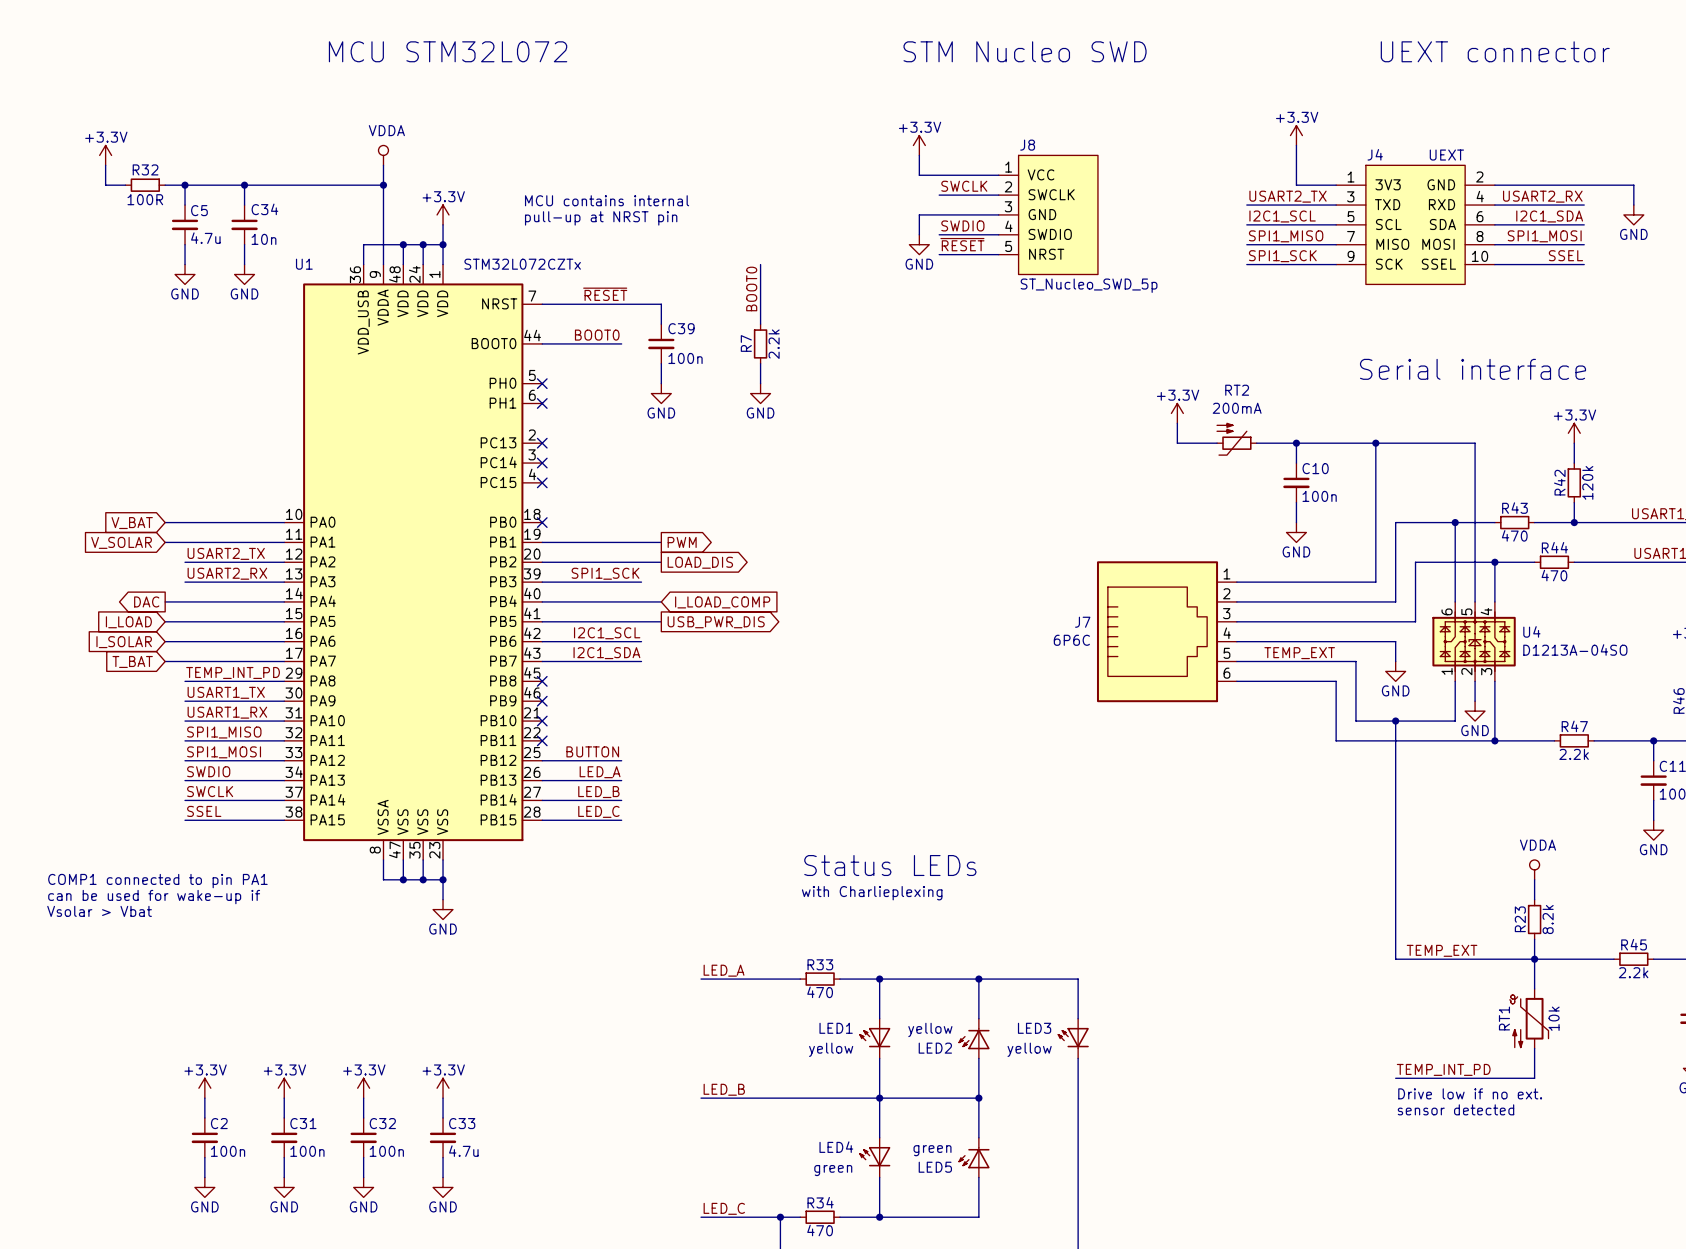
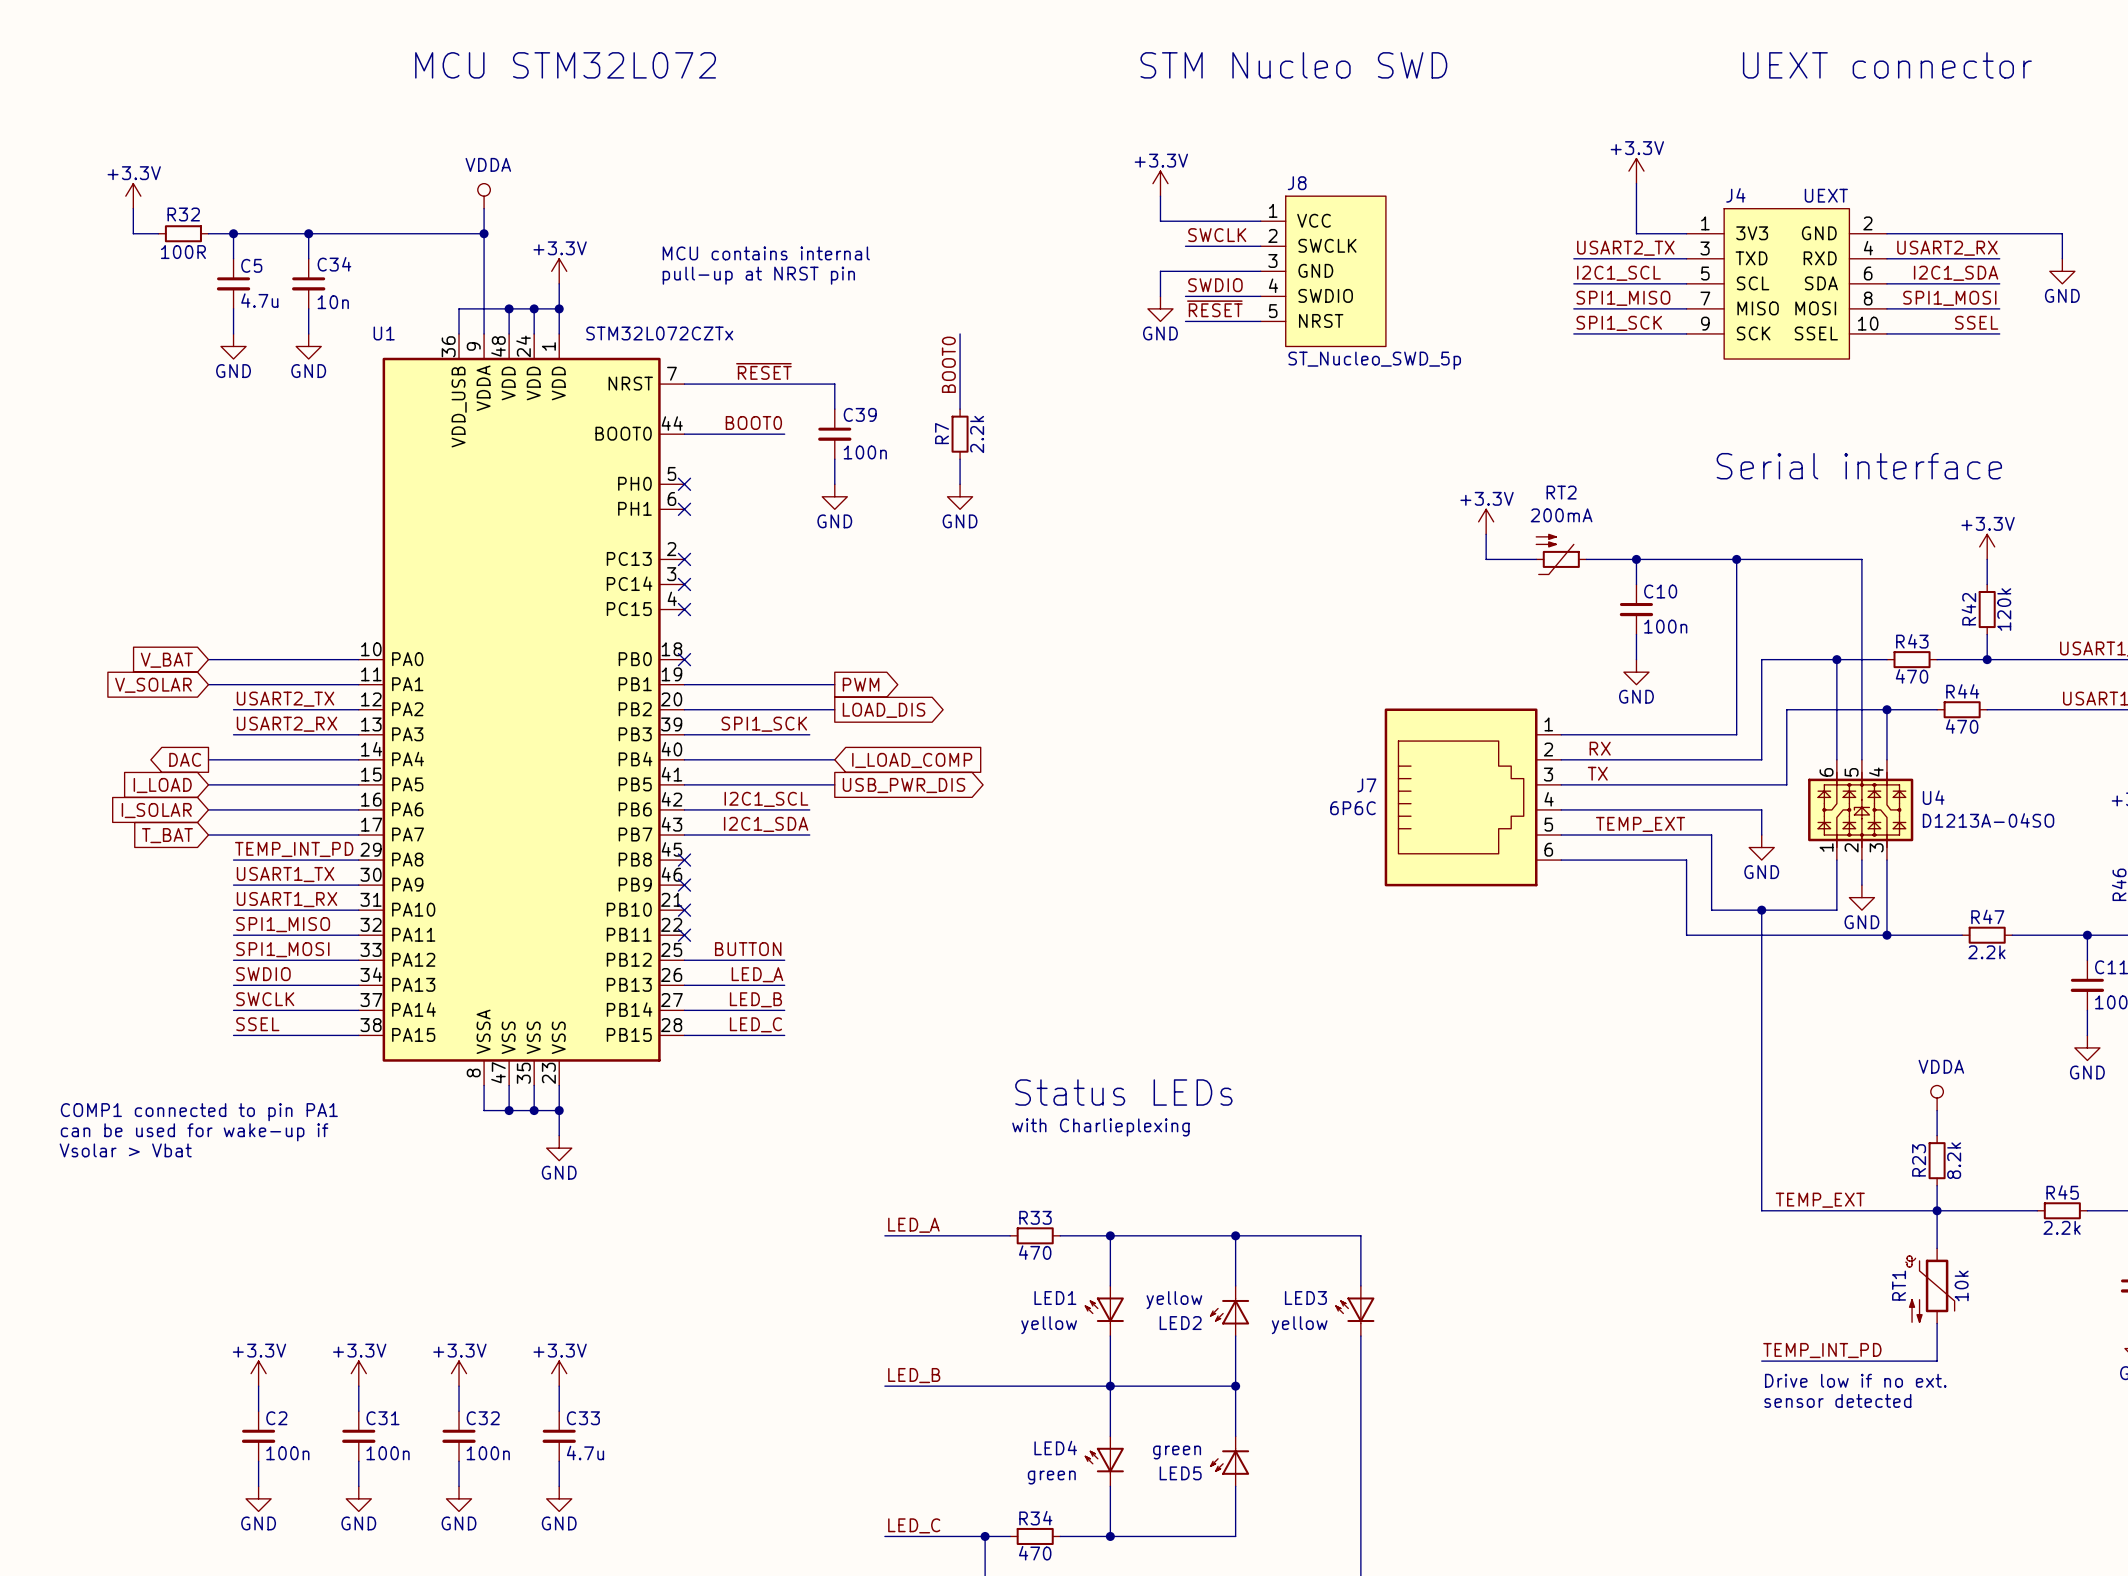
label: none -> RX (1600, 748)
label: none -> TX (1597, 773)

